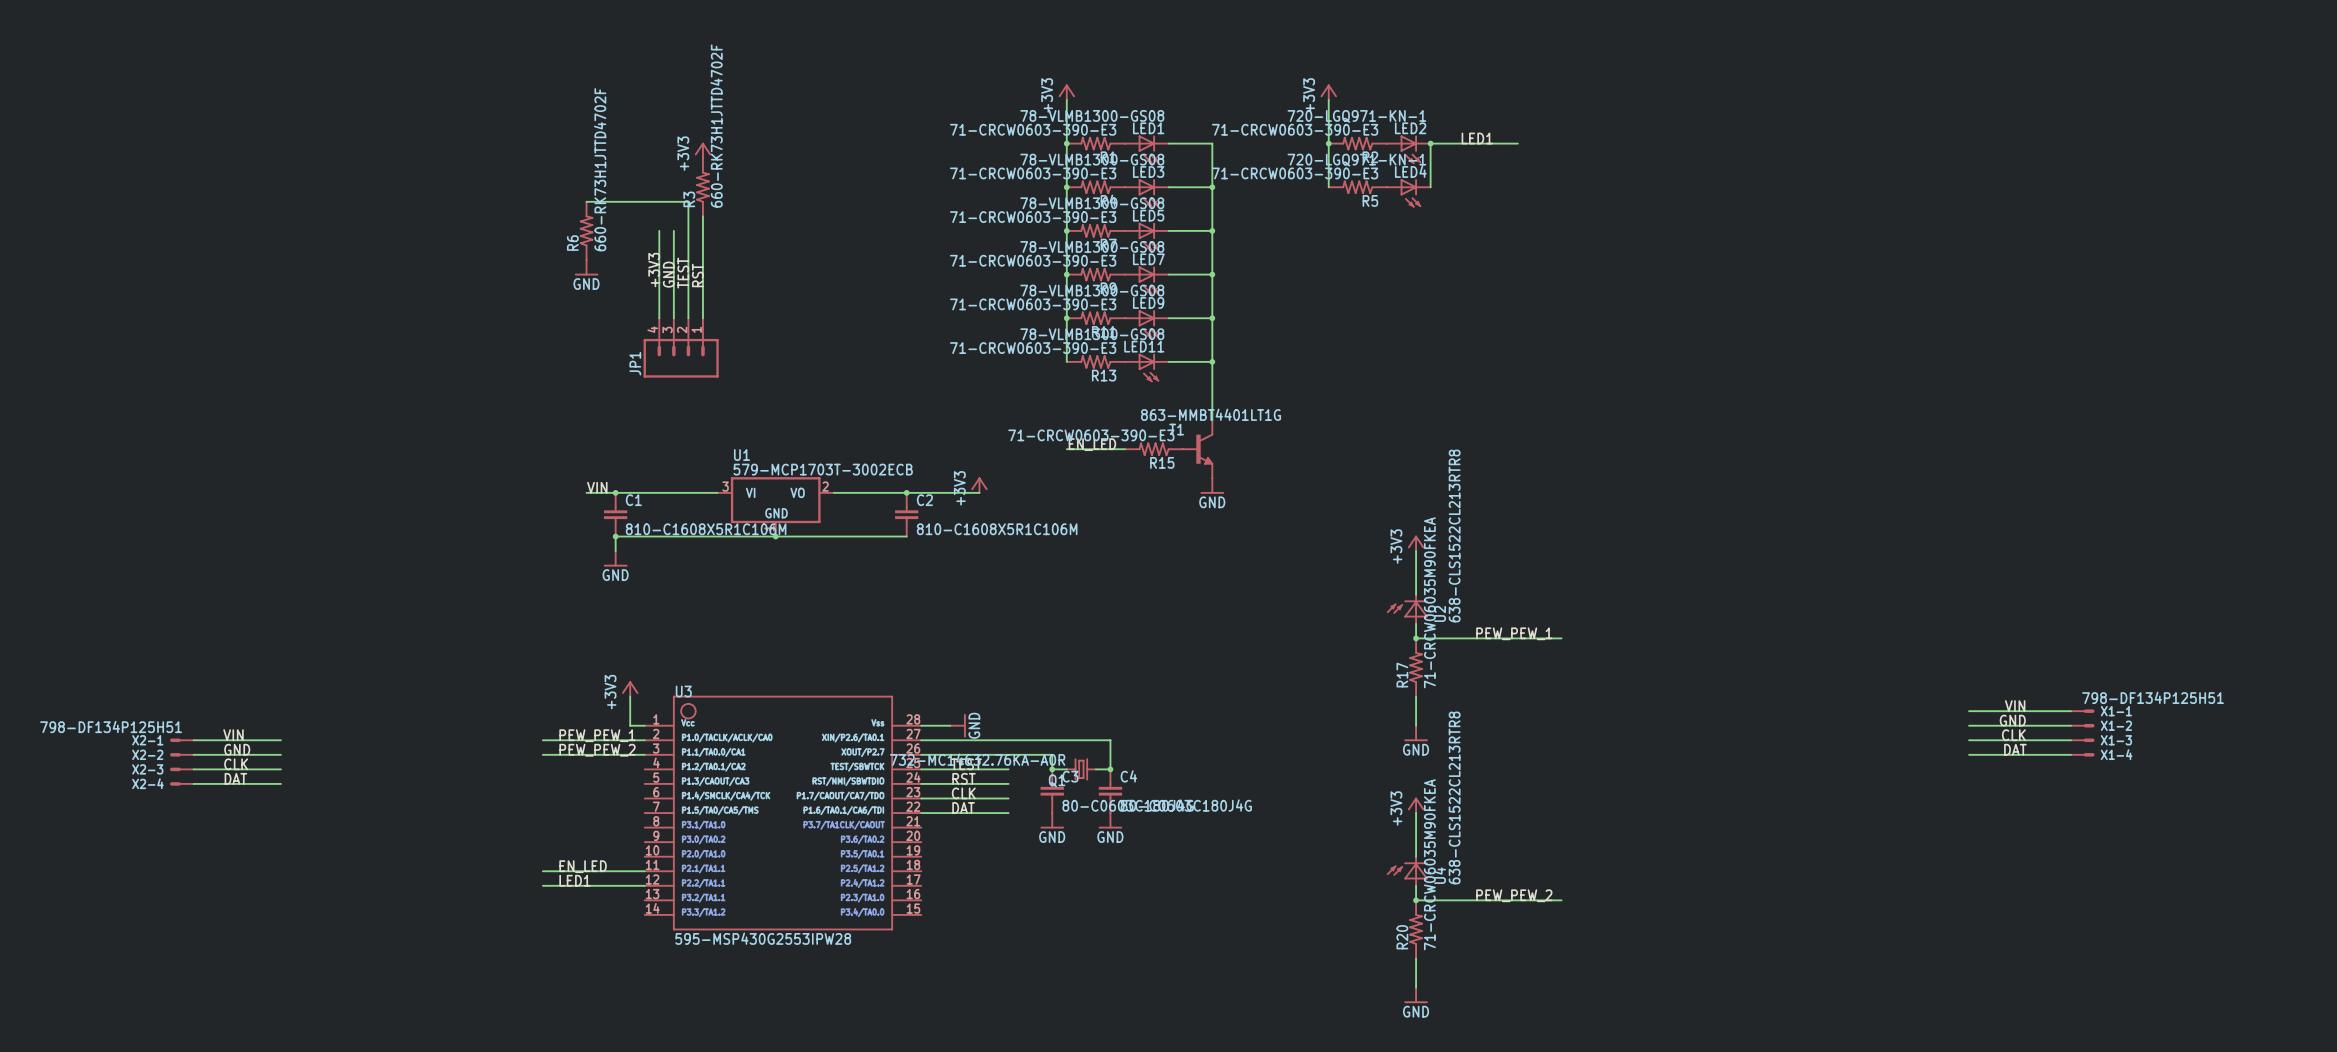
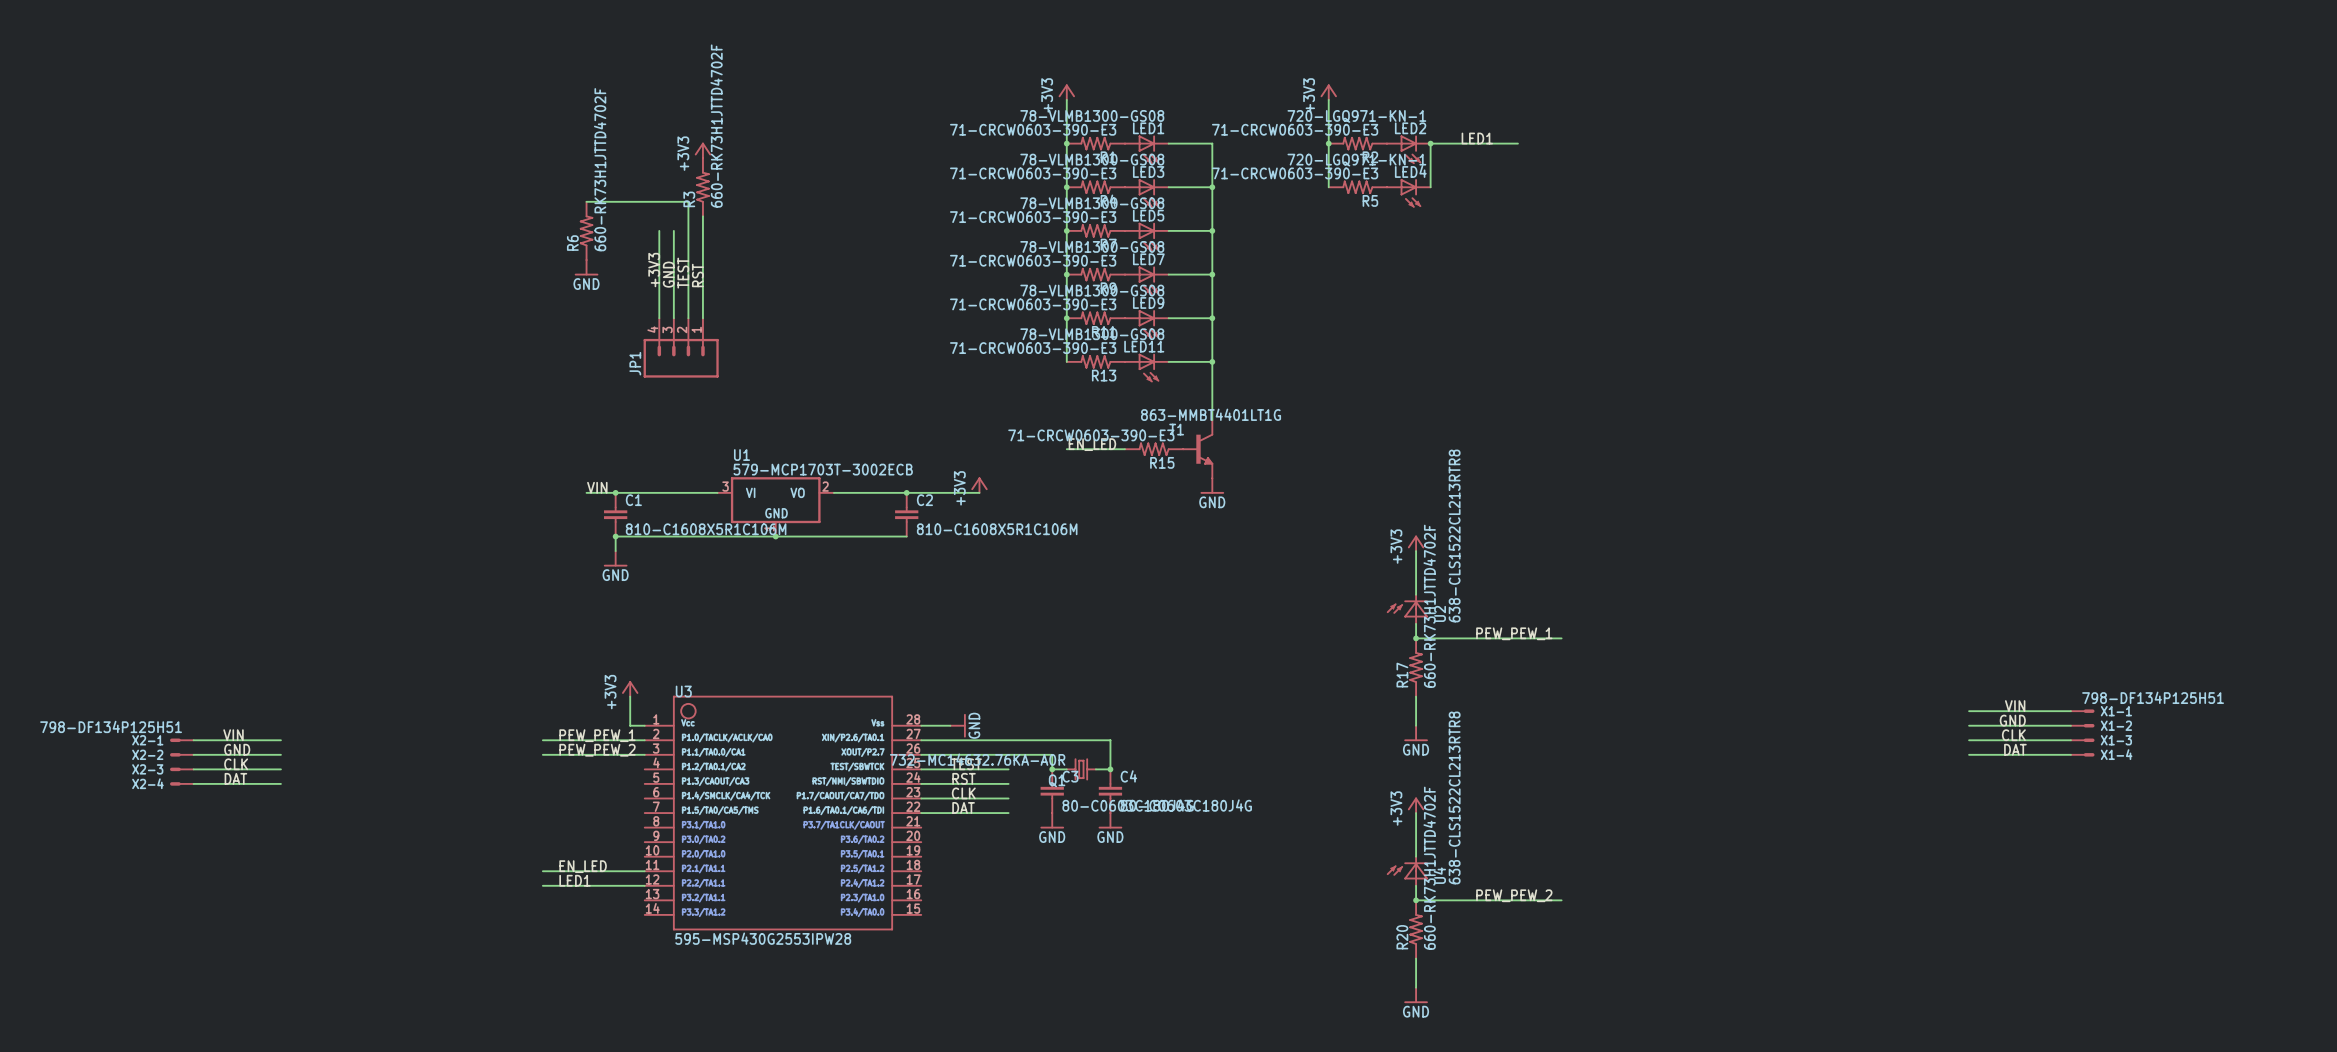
R17 value: 71-CRCW06035M90FKEA (1429, 602) -> 660-RK73H1JTTD4702F (1429, 606)
R20 value: 71-CRCW06035M90FKEA (1429, 864) -> 660-RK73H1JTTD4702F (1429, 868)

